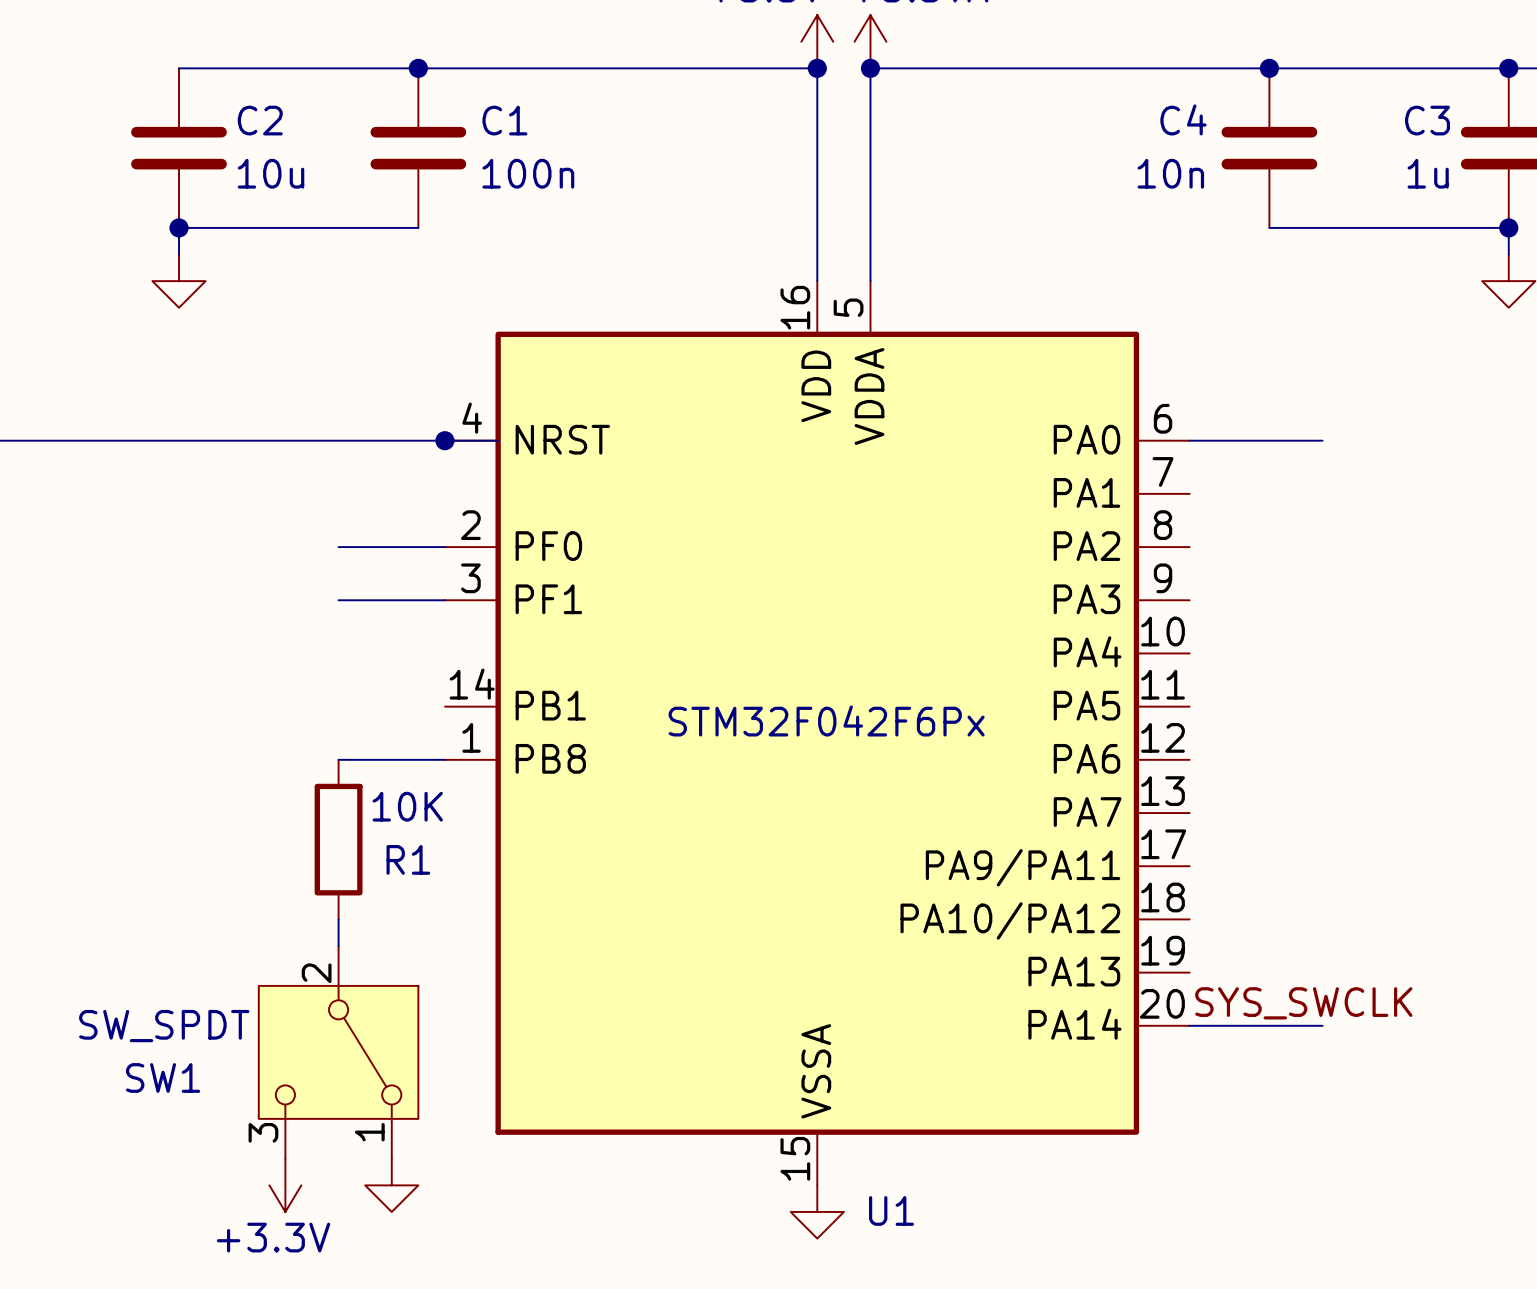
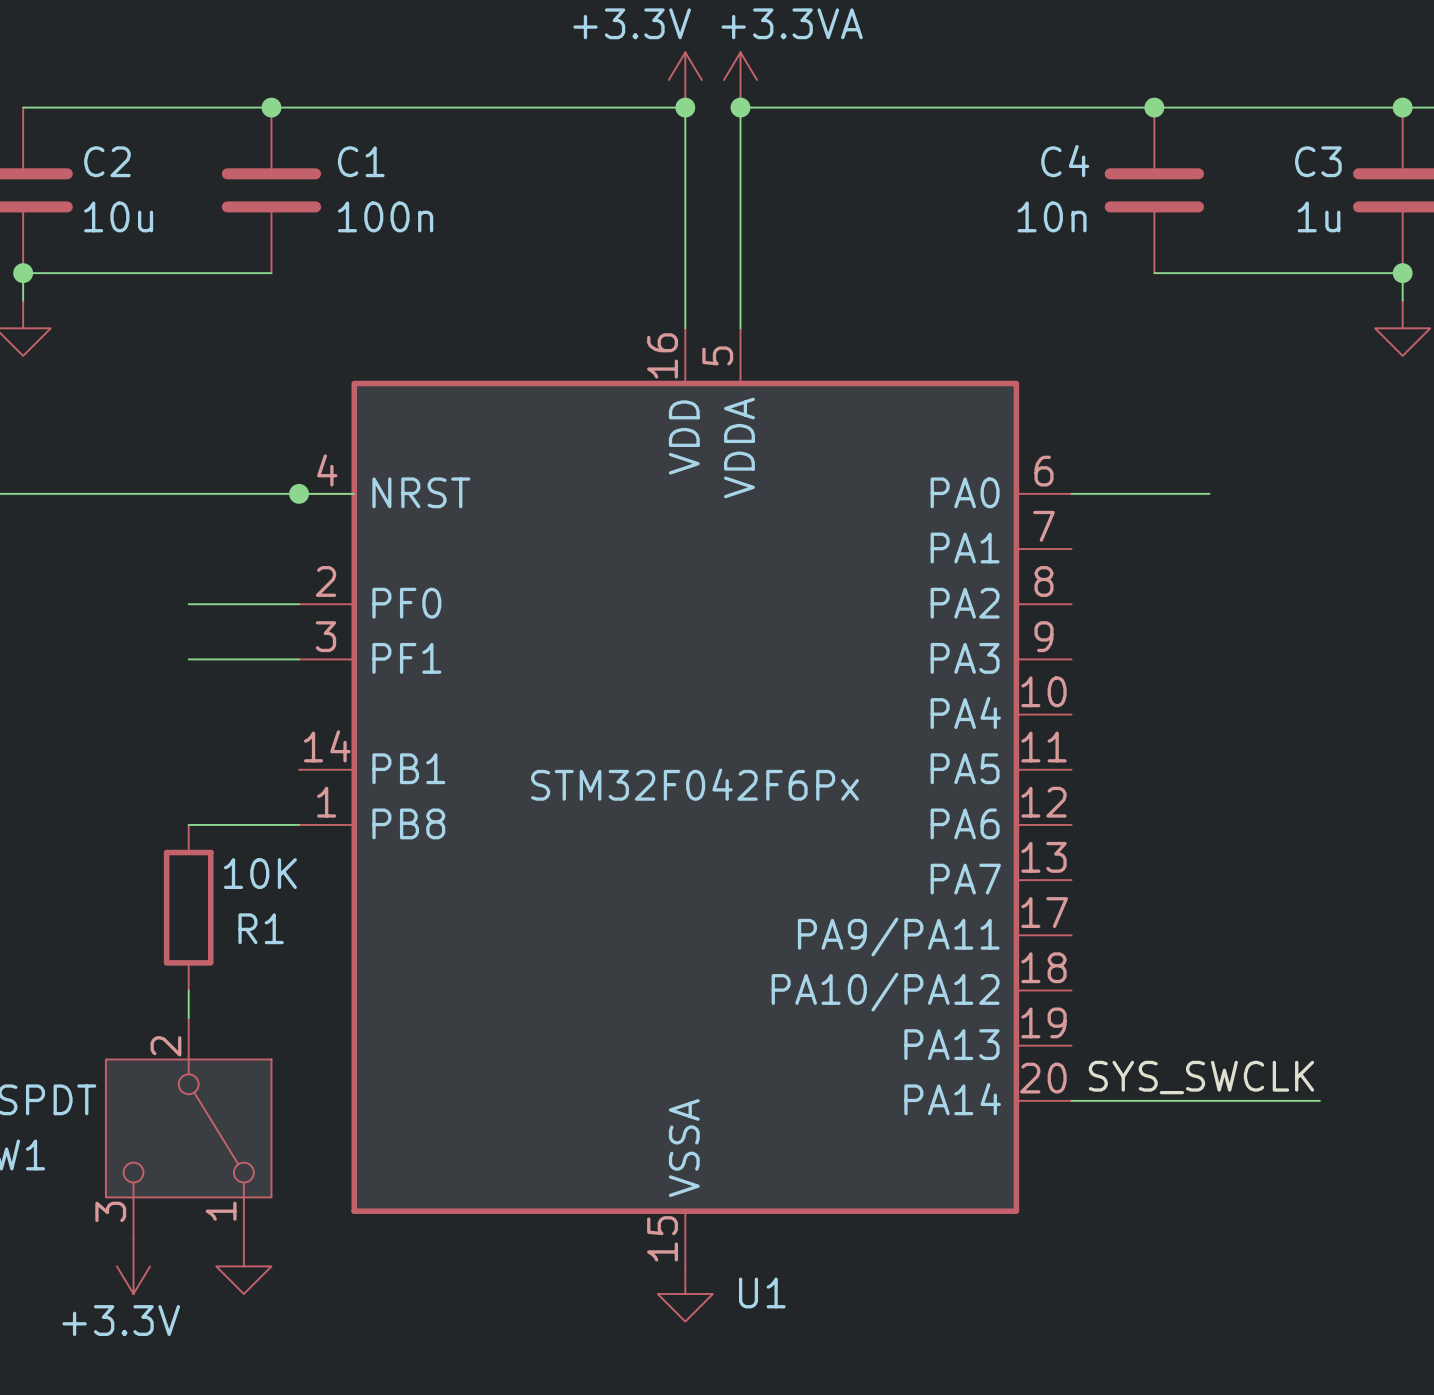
label position: SYS_SWCLK (1303, 1003) -> SYS_SWCLK (1201, 1077)
wire: none -> (1209, 1100) (1319, 1100)

